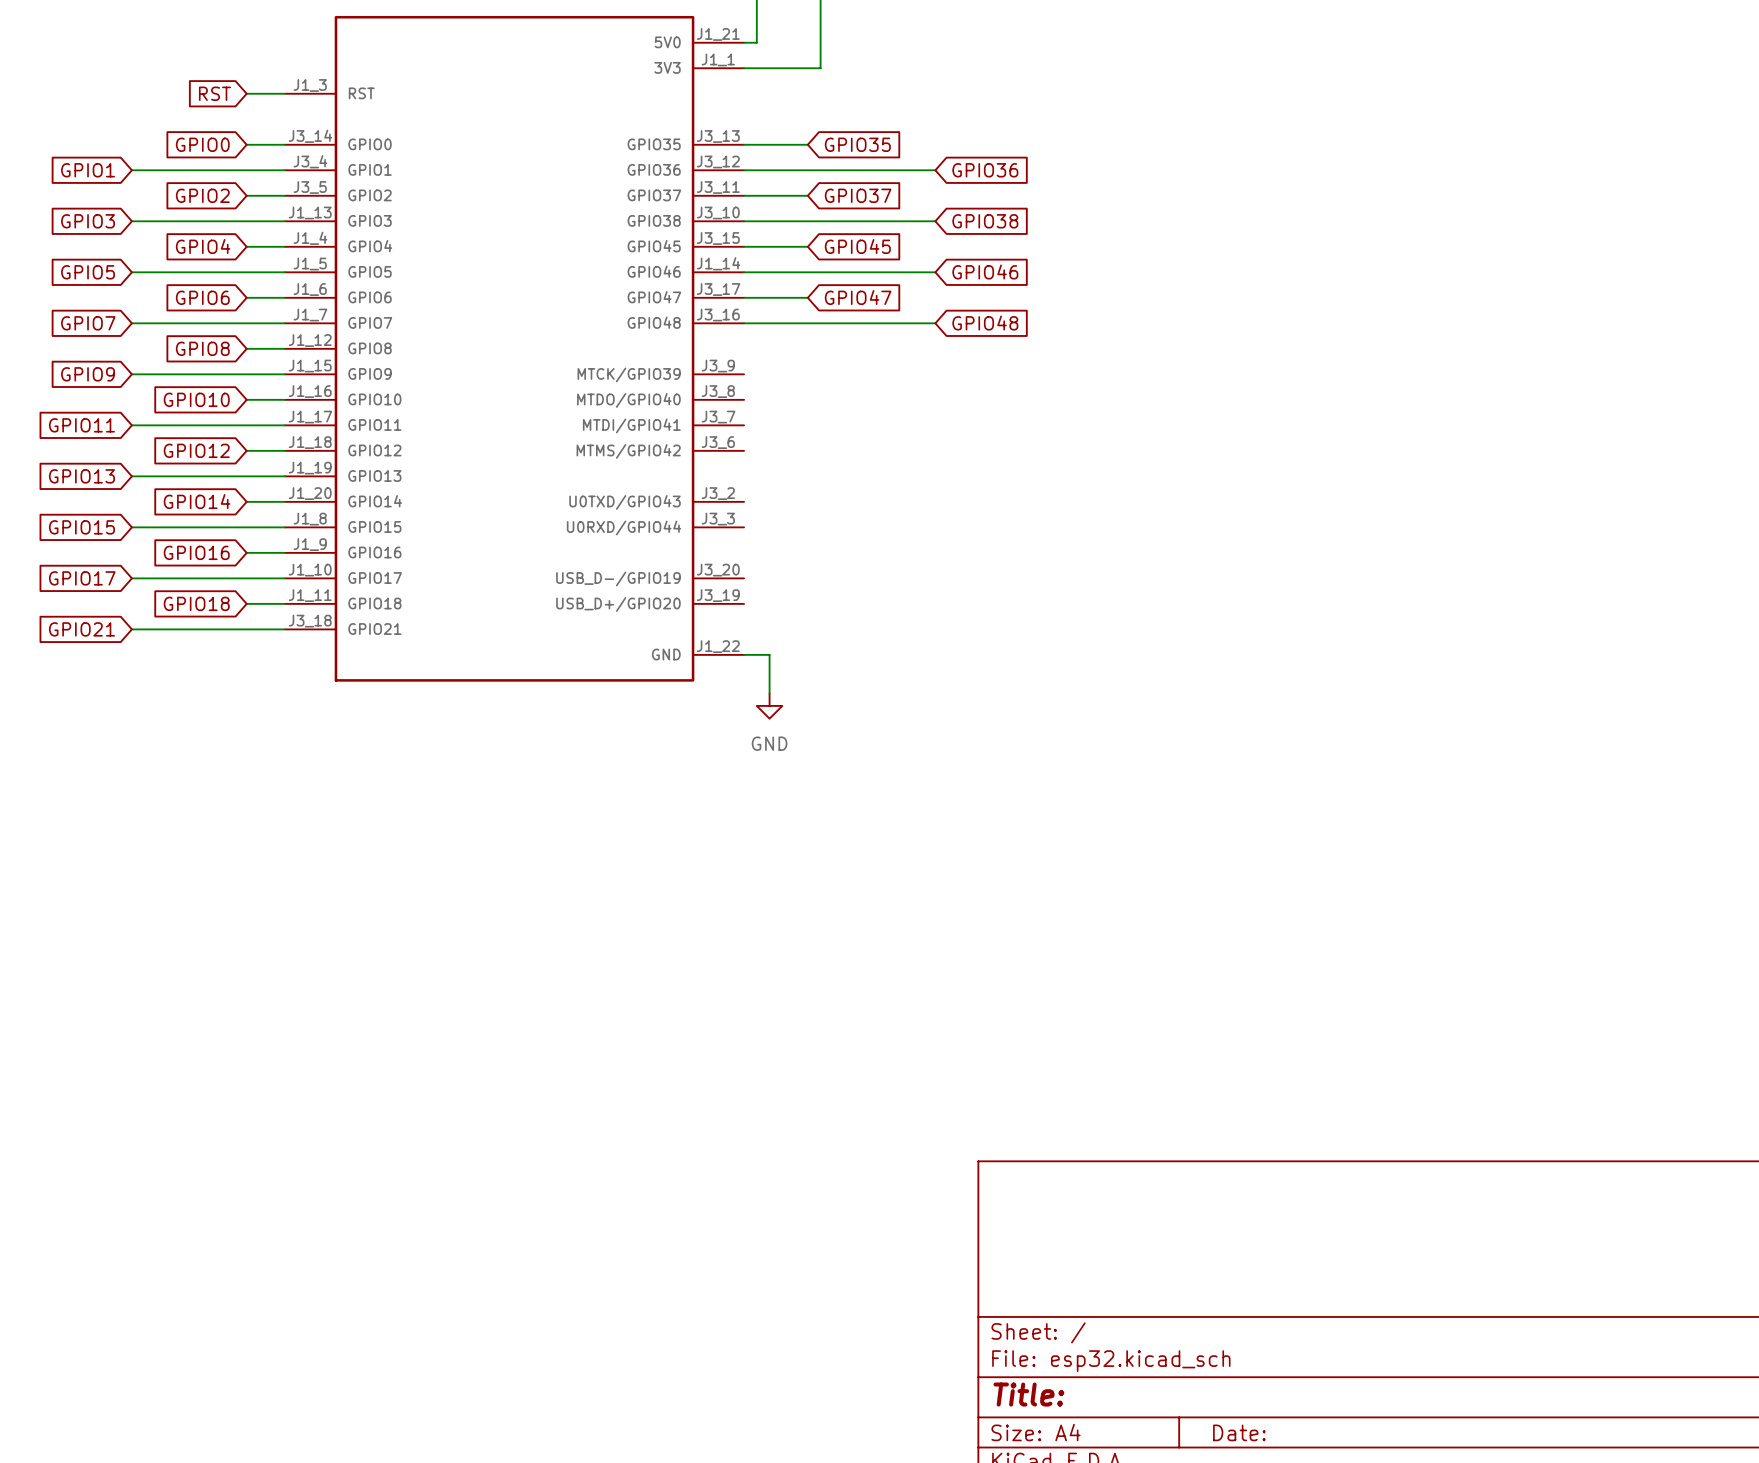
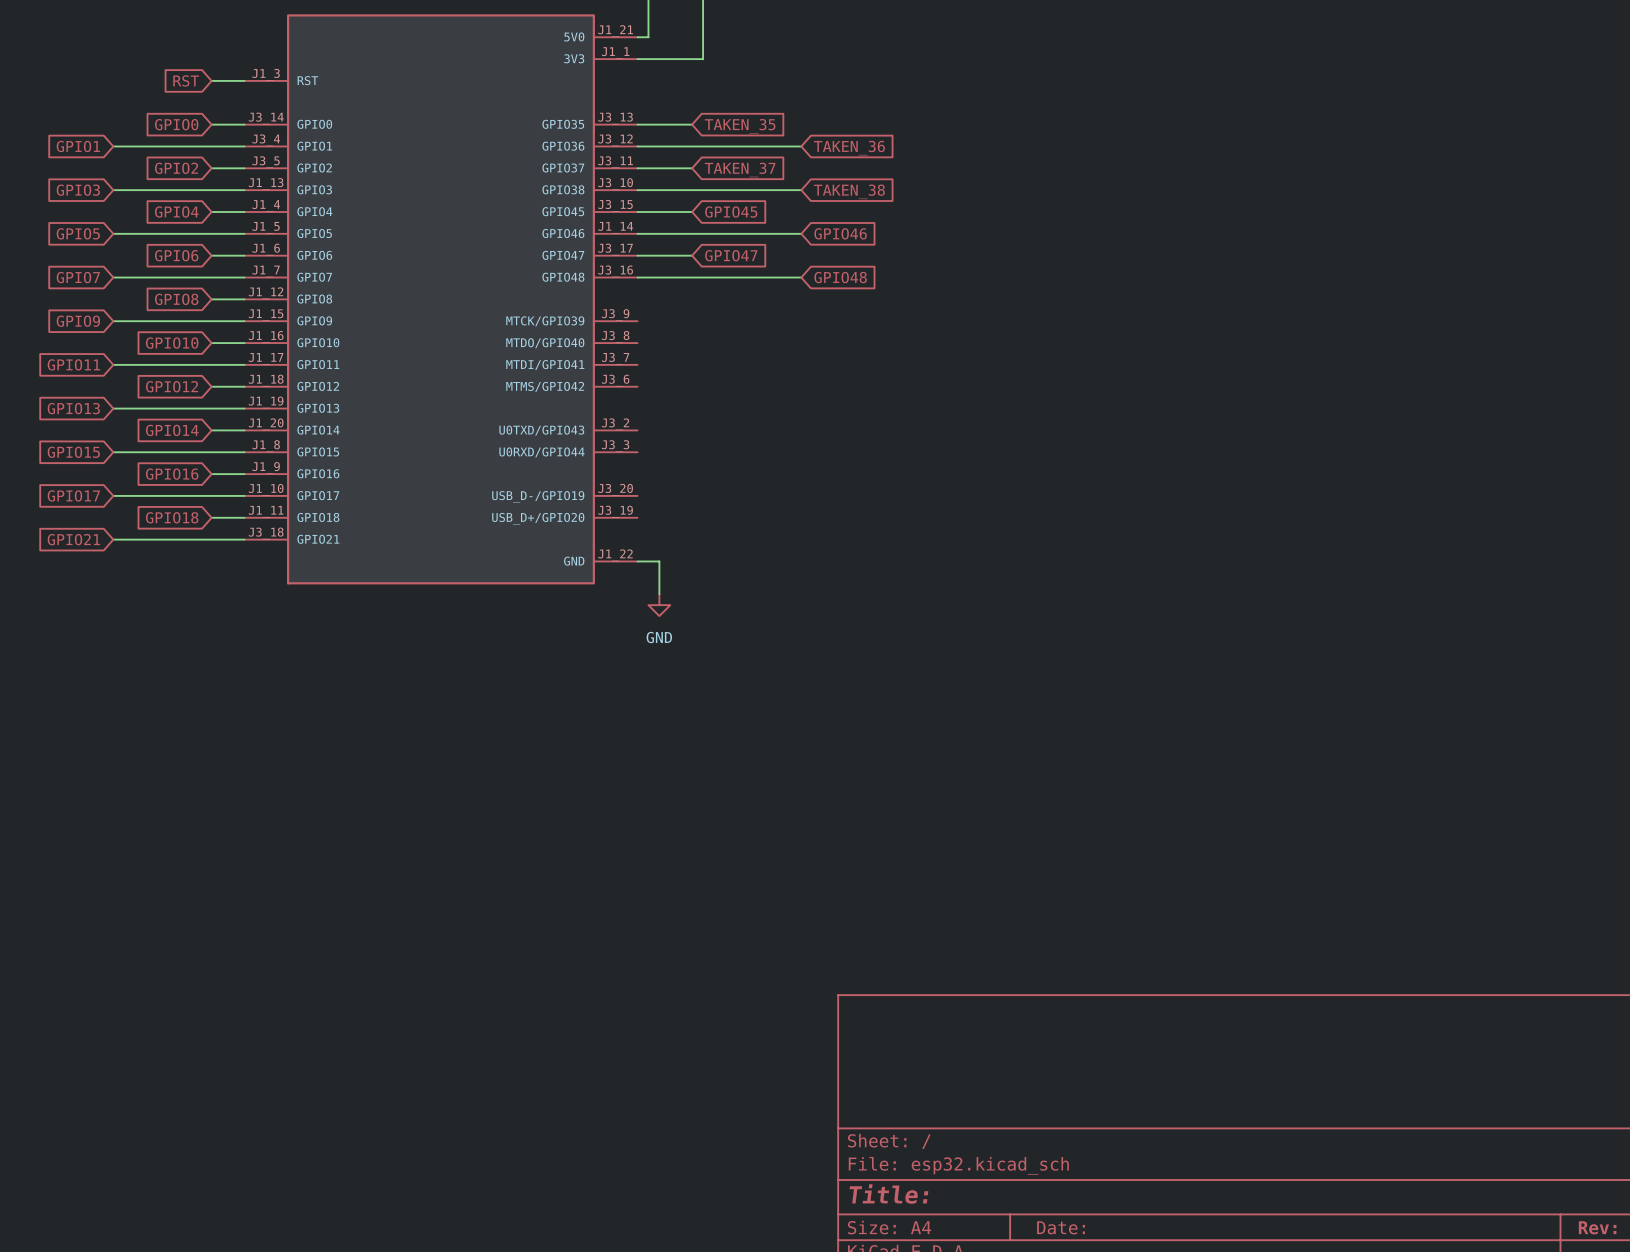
global label: GPIO35 (857, 144) -> TAKEN_35 (740, 126)
global label: GPIO36 (985, 170) -> TAKEN_36 (849, 148)
global label: GPIO37 (858, 195) -> TAKEN_37 (740, 169)
global label: GPIO38 (985, 221) -> TAKEN_38 (849, 191)

